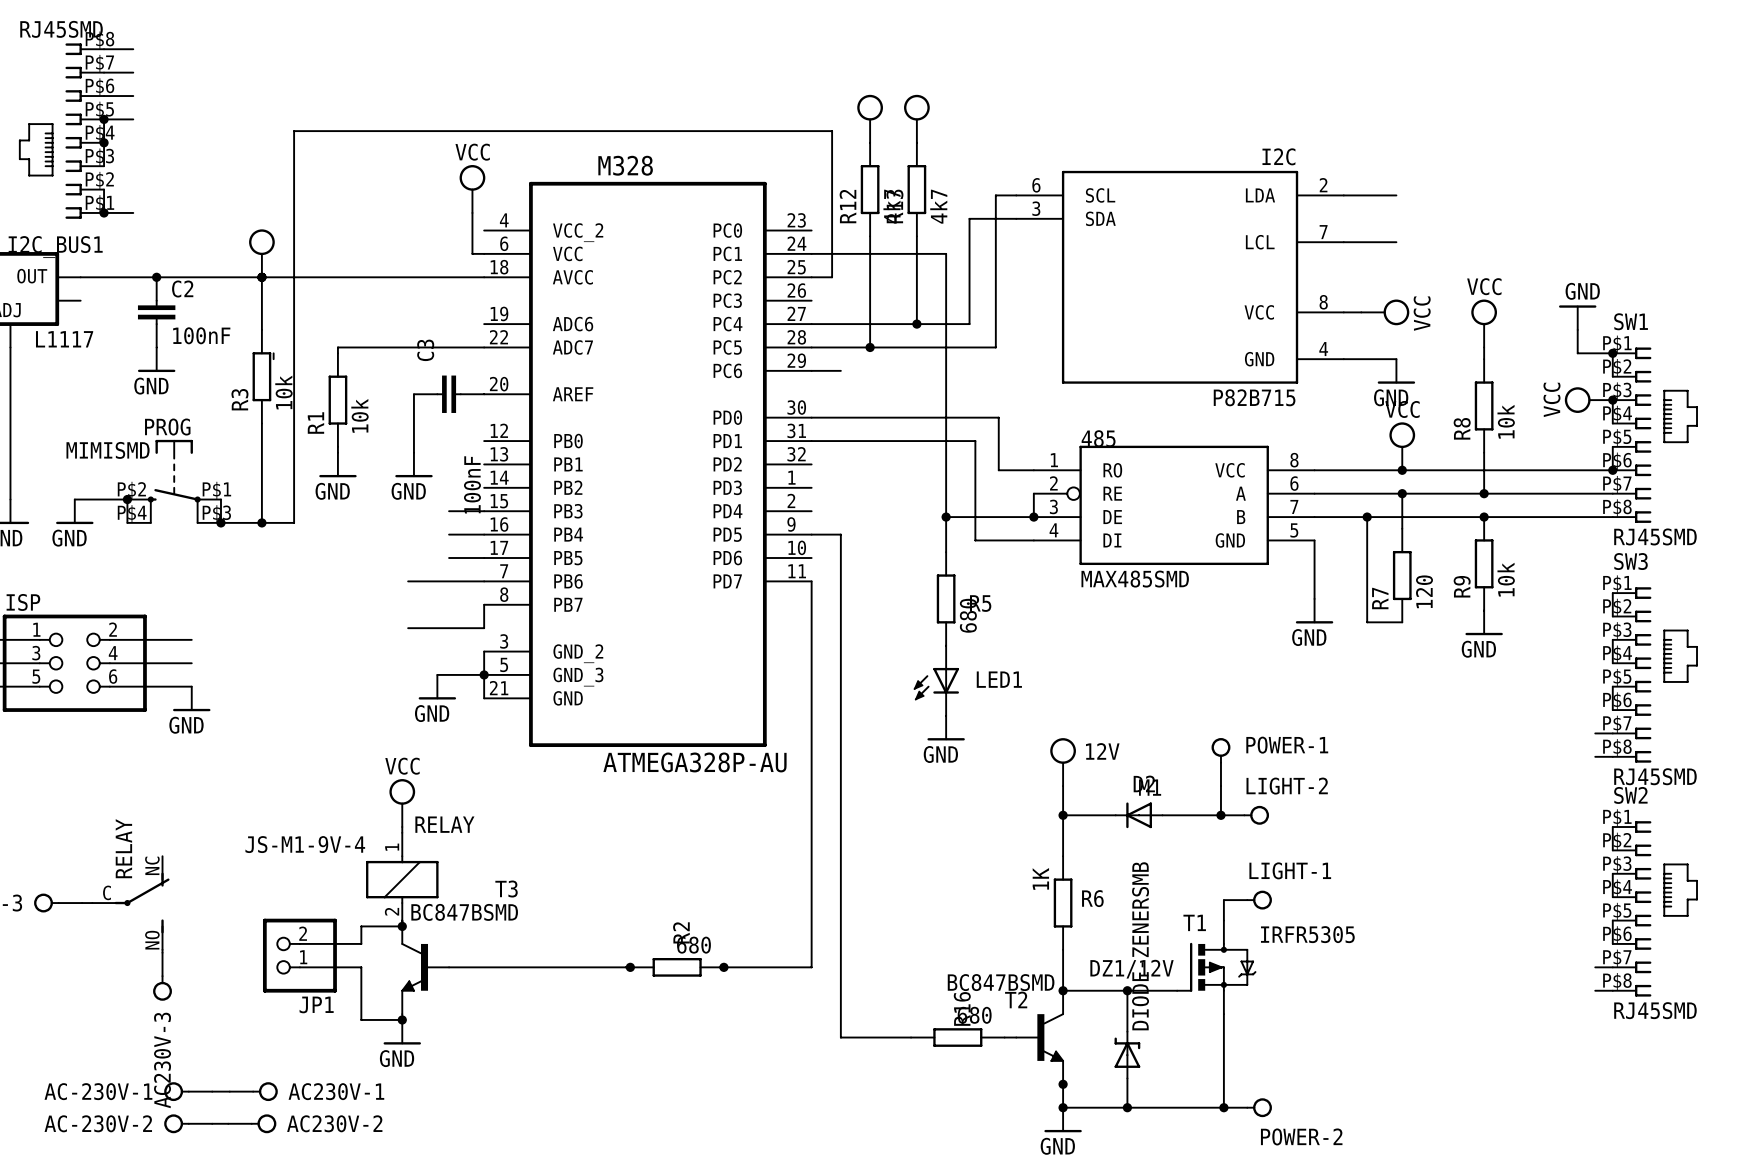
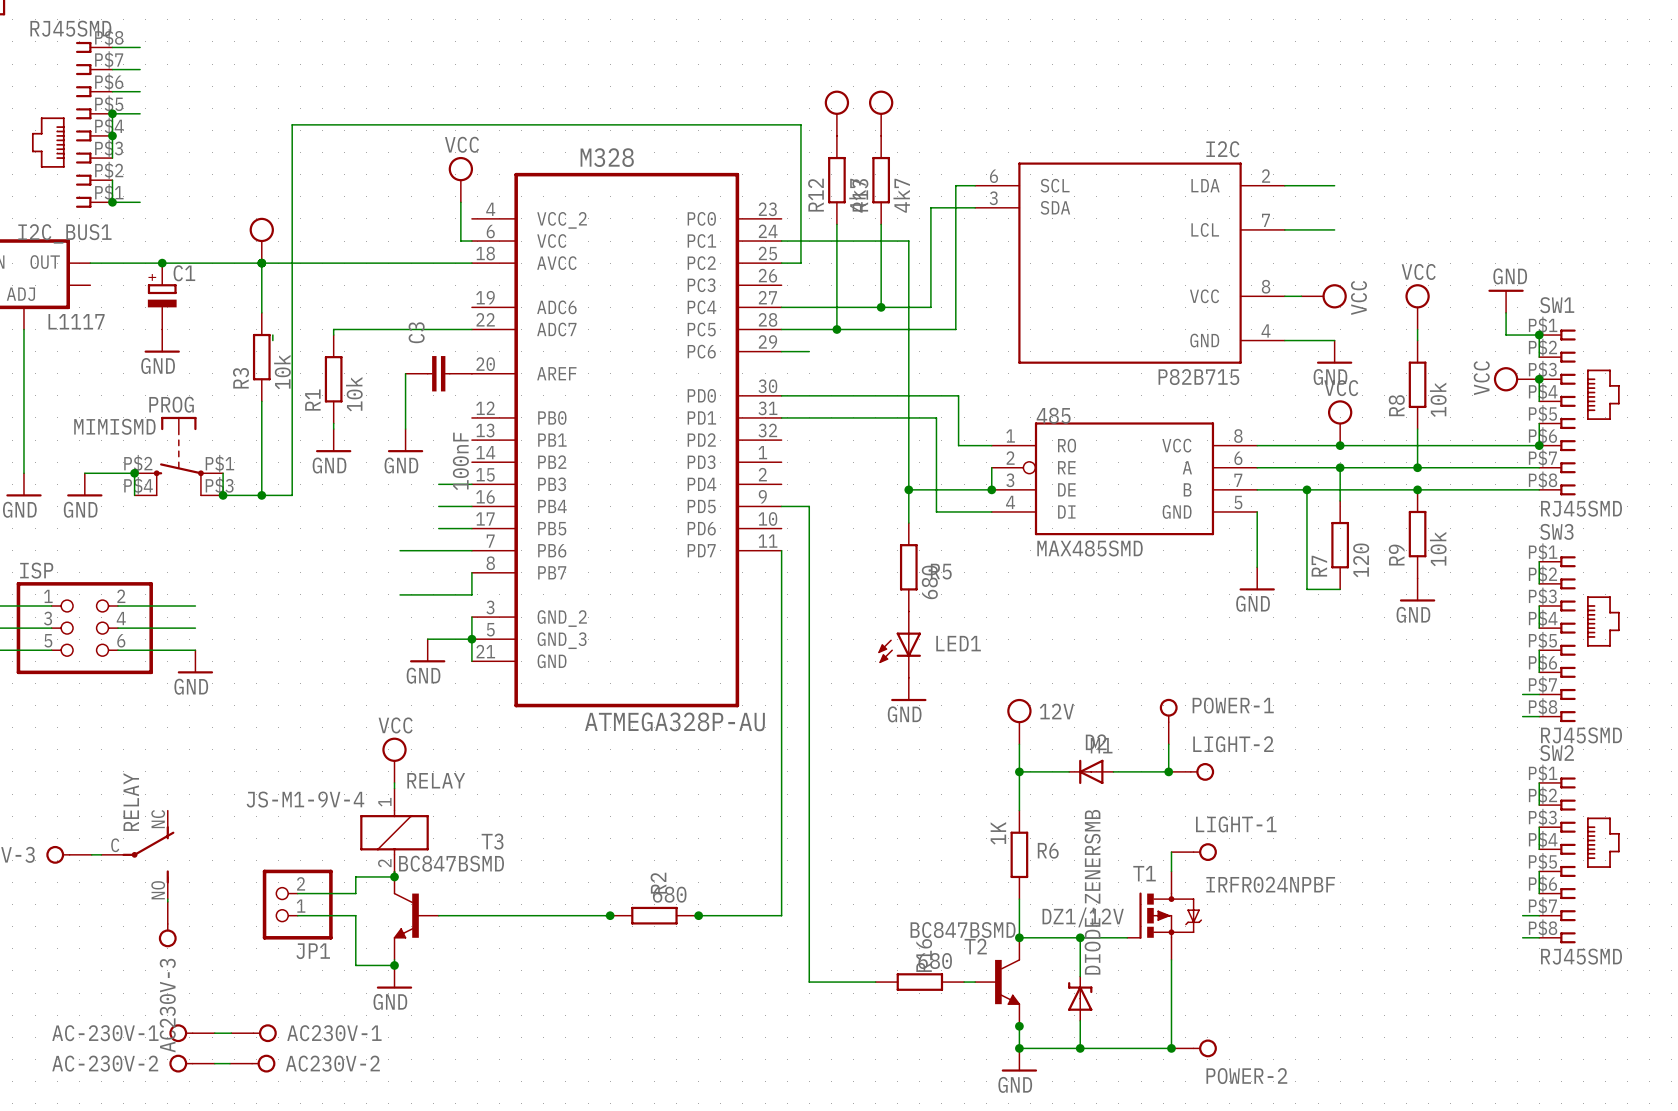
C2: 100nF (156, 312) -> none
C1: none -> (162, 296)
T1 value: IRFR5305 (1307, 934) -> IRFR024NPBF (1270, 884)

